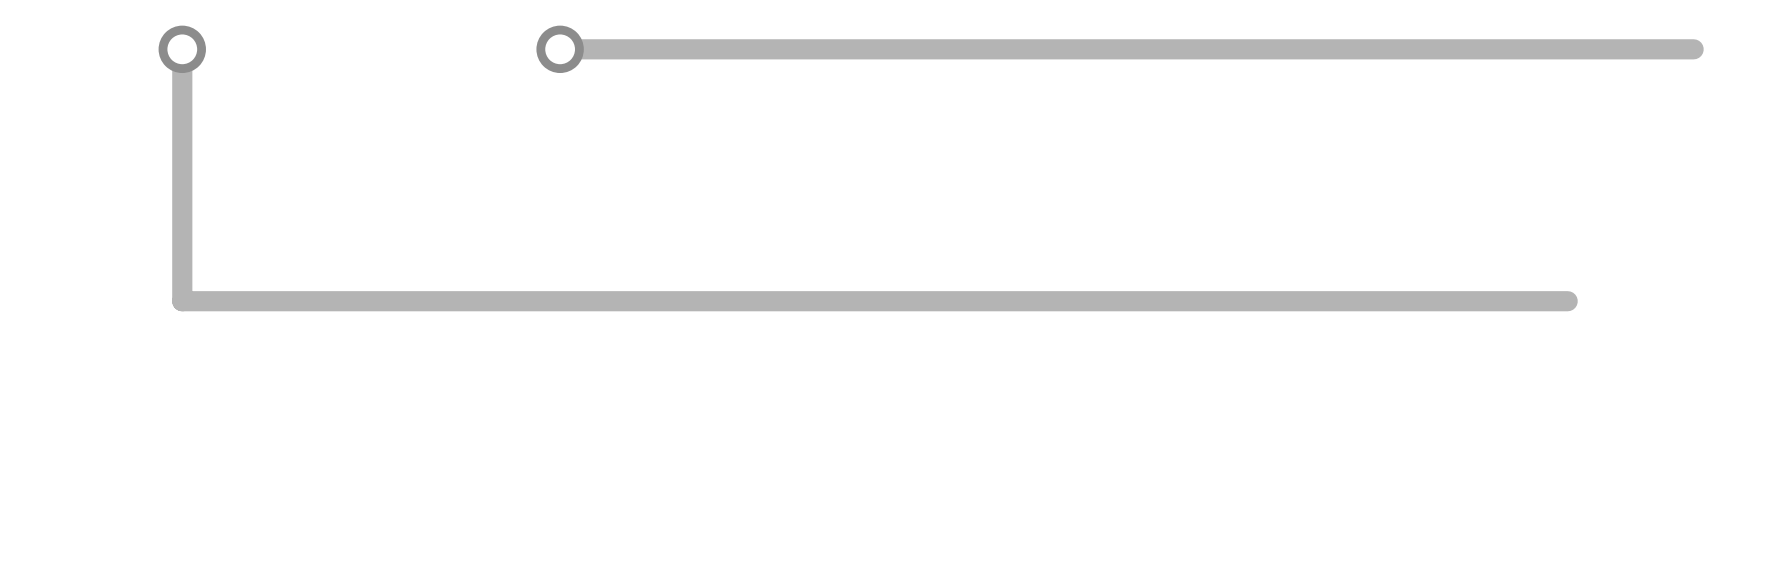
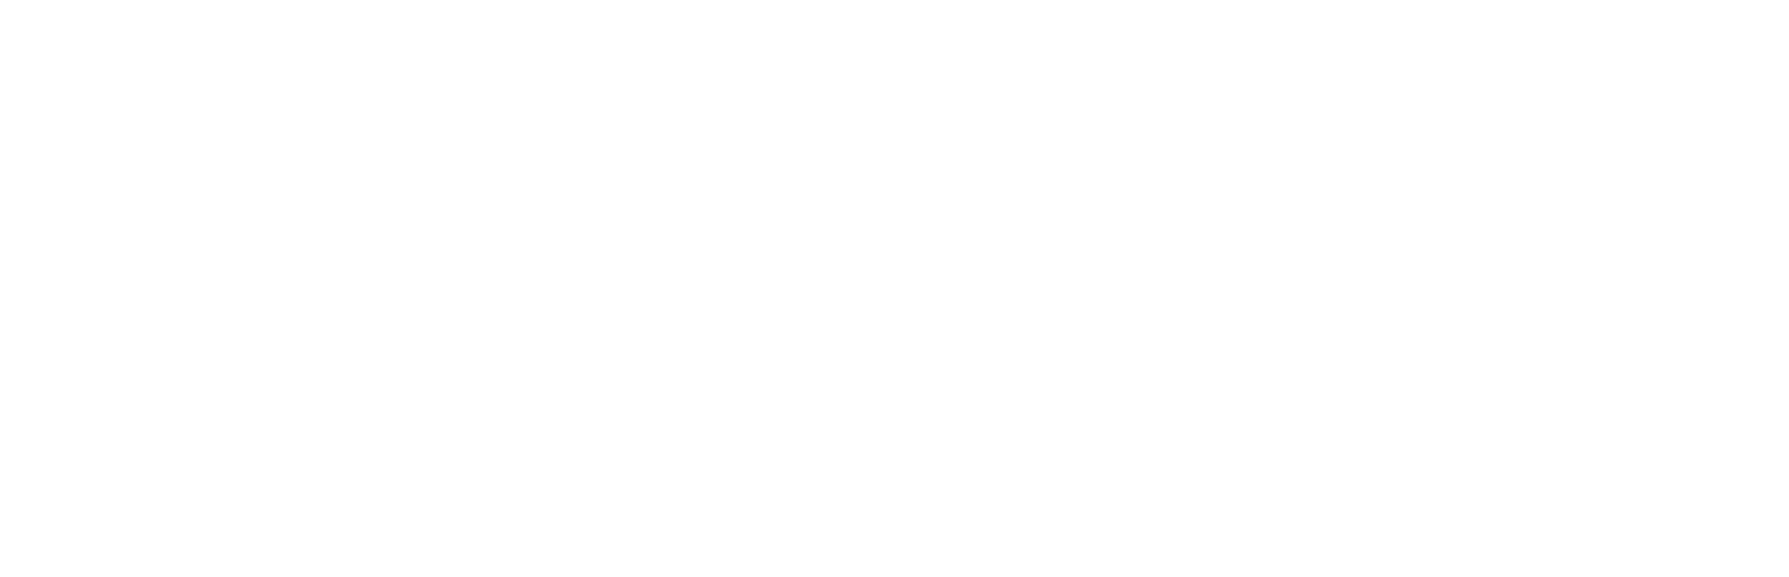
track: (182, 49) (182, 301) (1567, 301) -> none
via: (182, 49) -> none
via: (560, 49) -> none
track: (1693, 49) (560, 49) -> none

